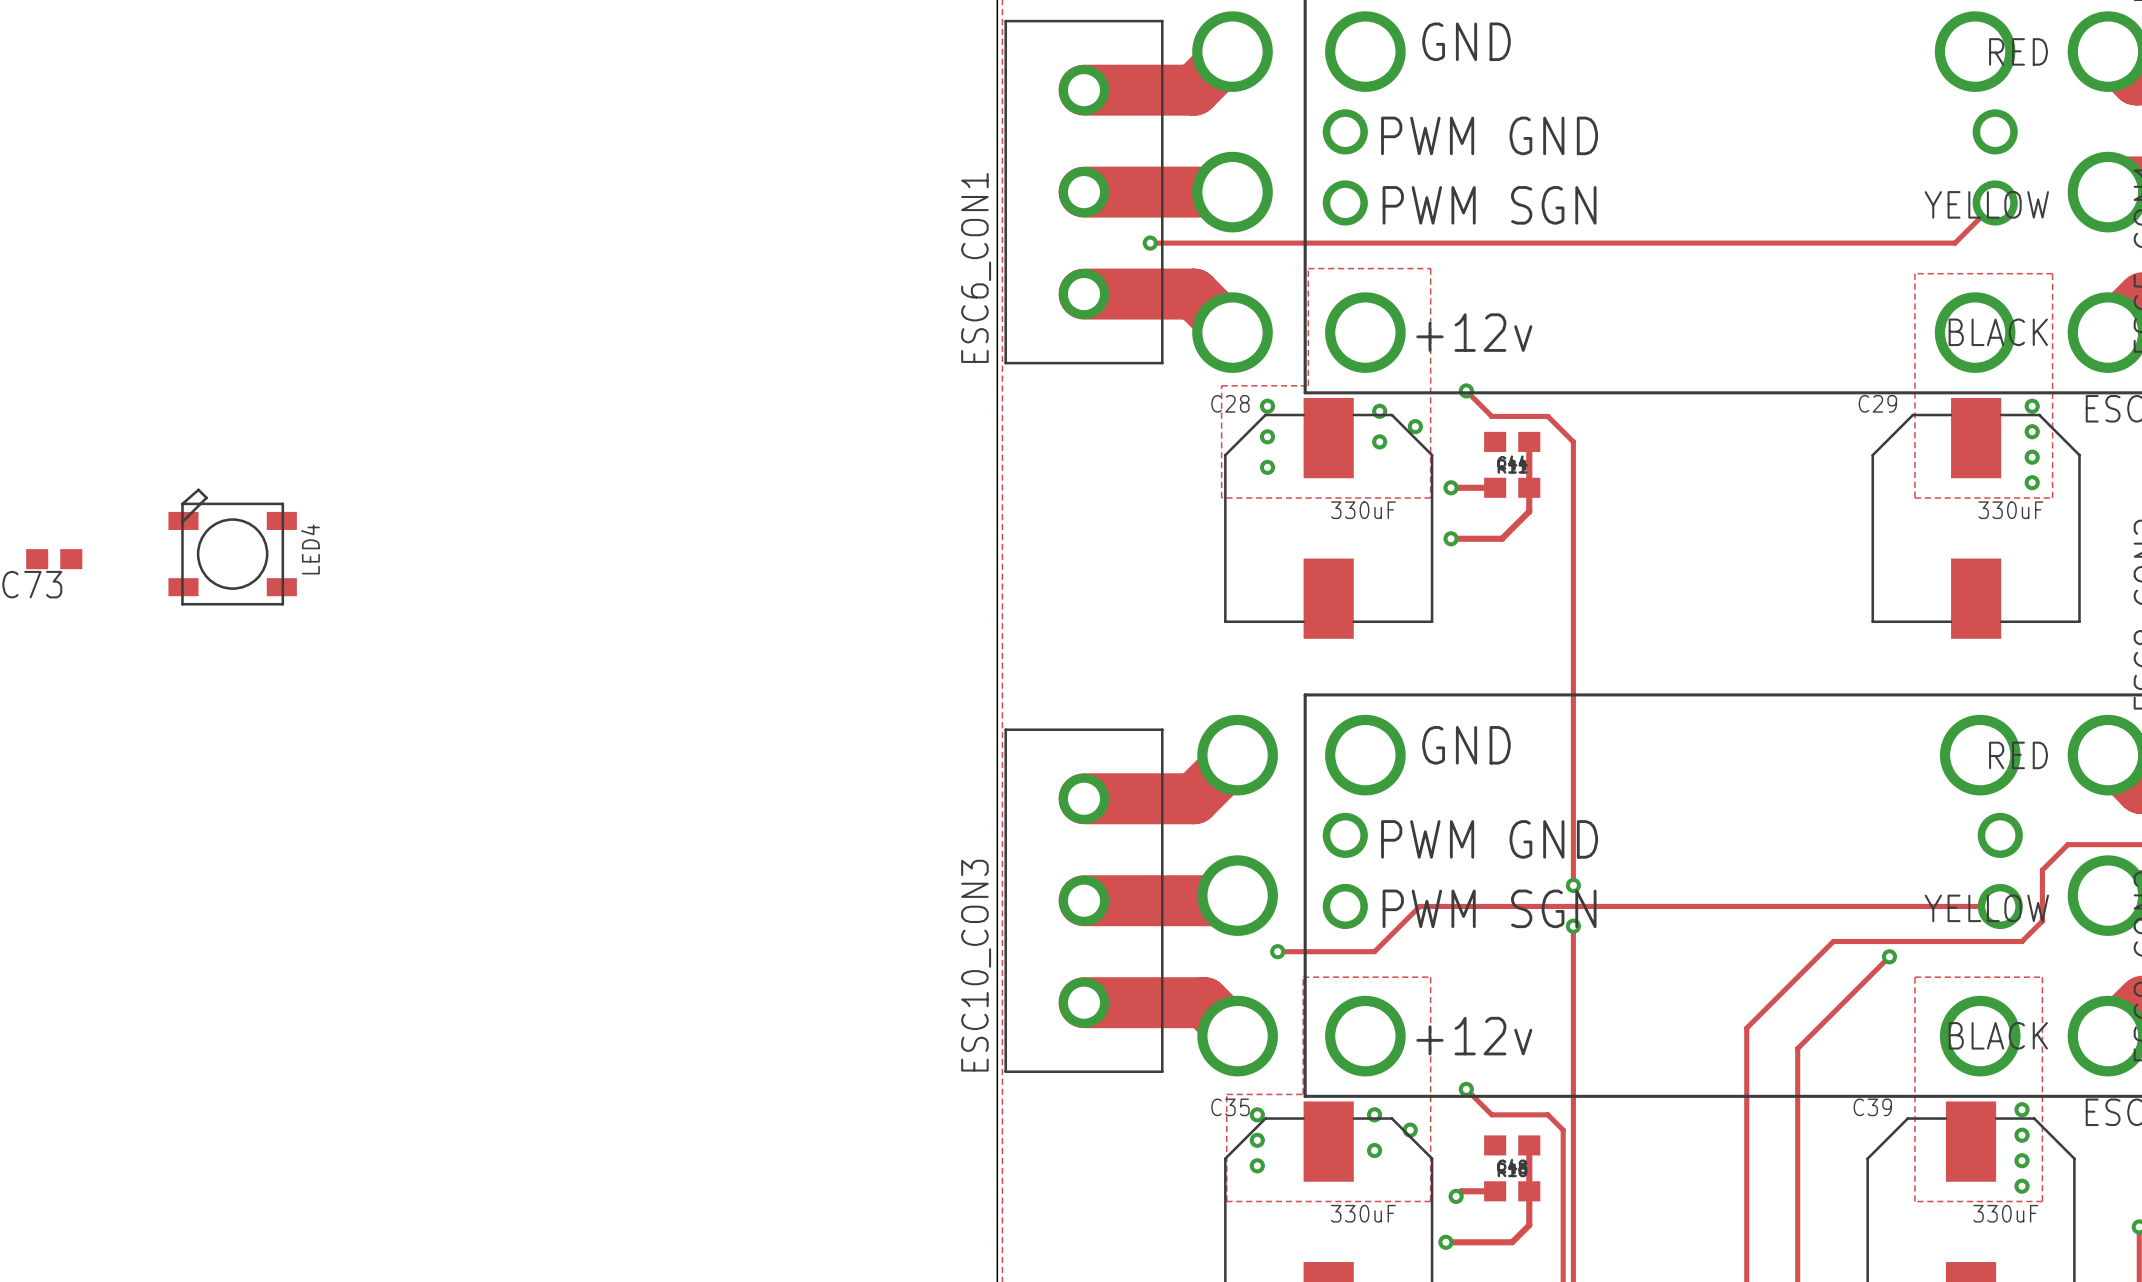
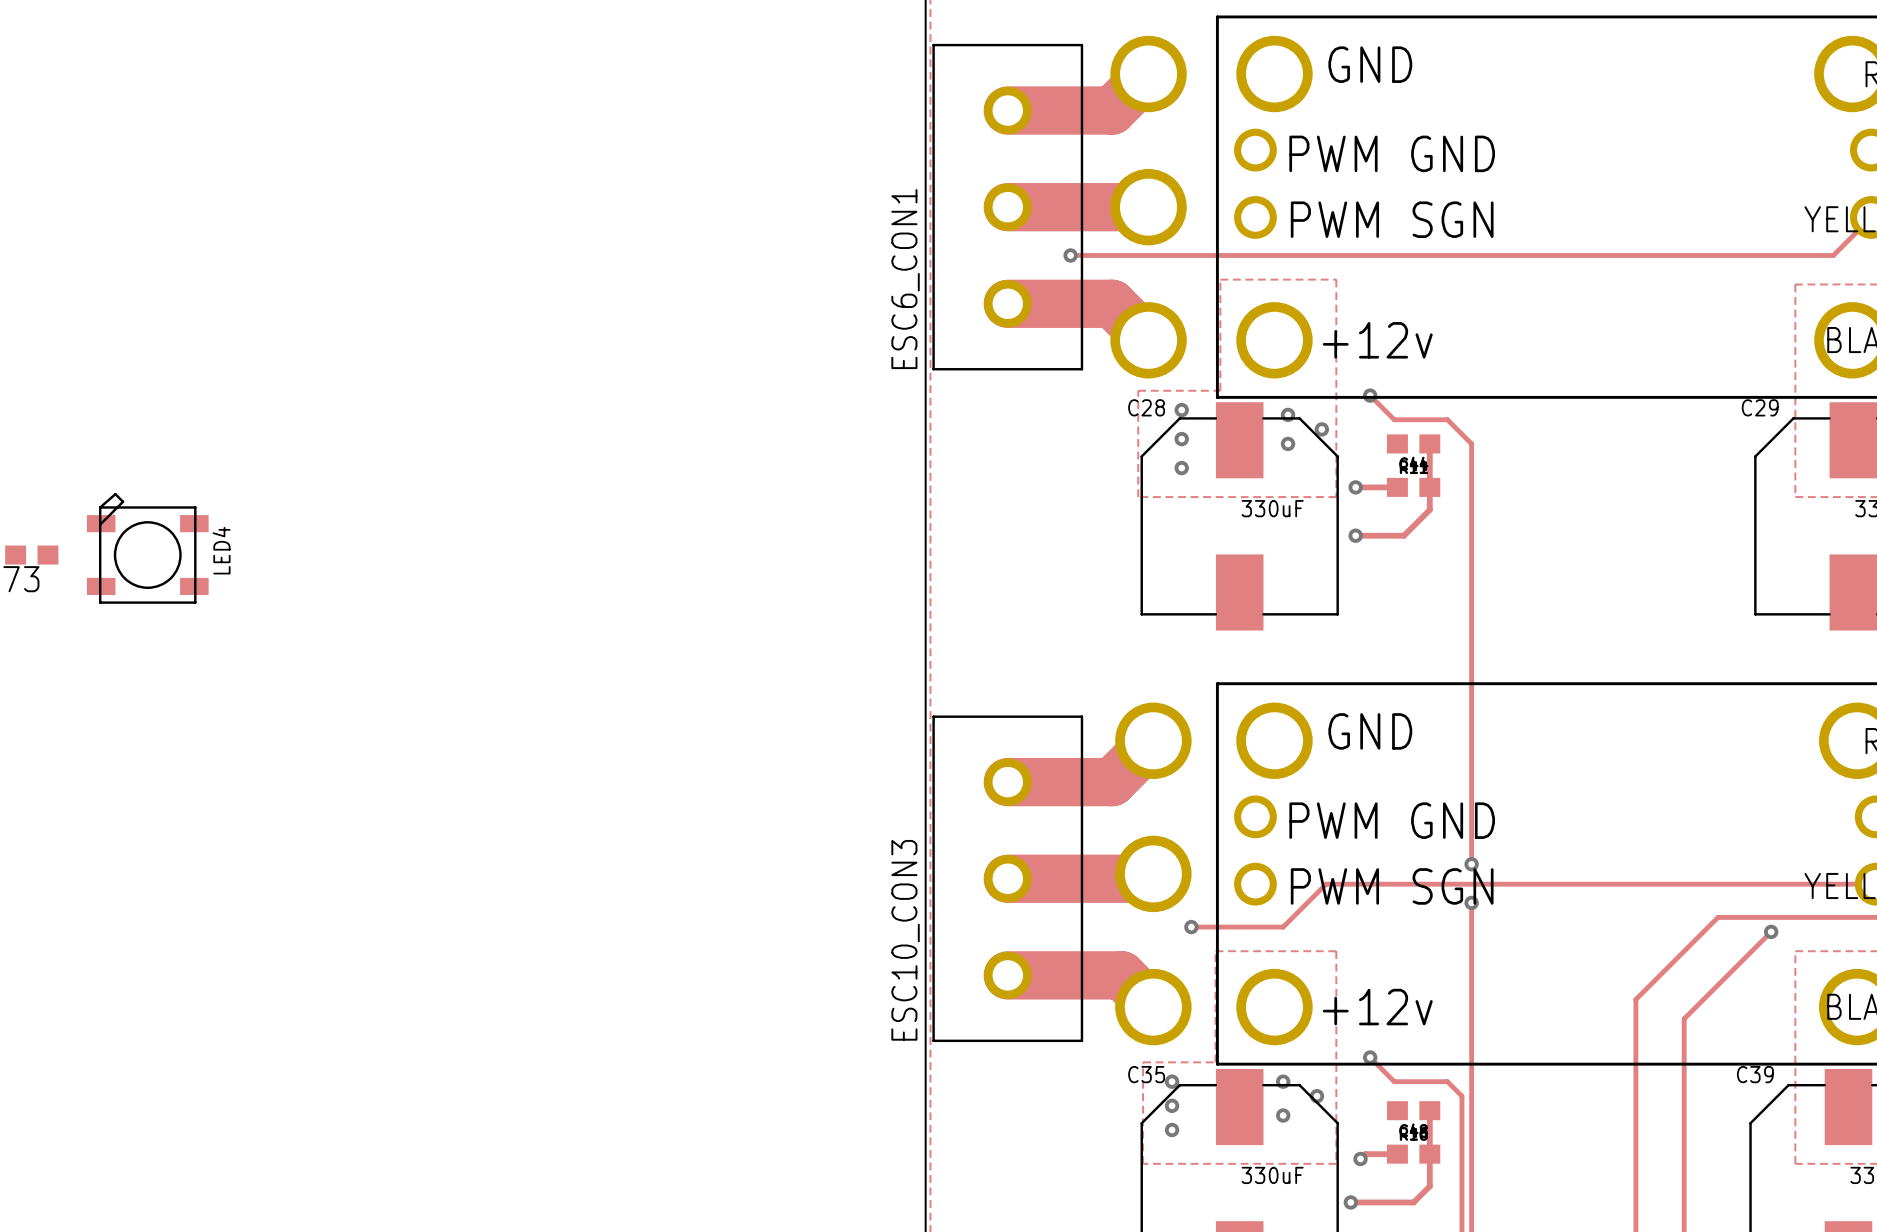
LED4 position: (232, 547) -> (147, 548)

